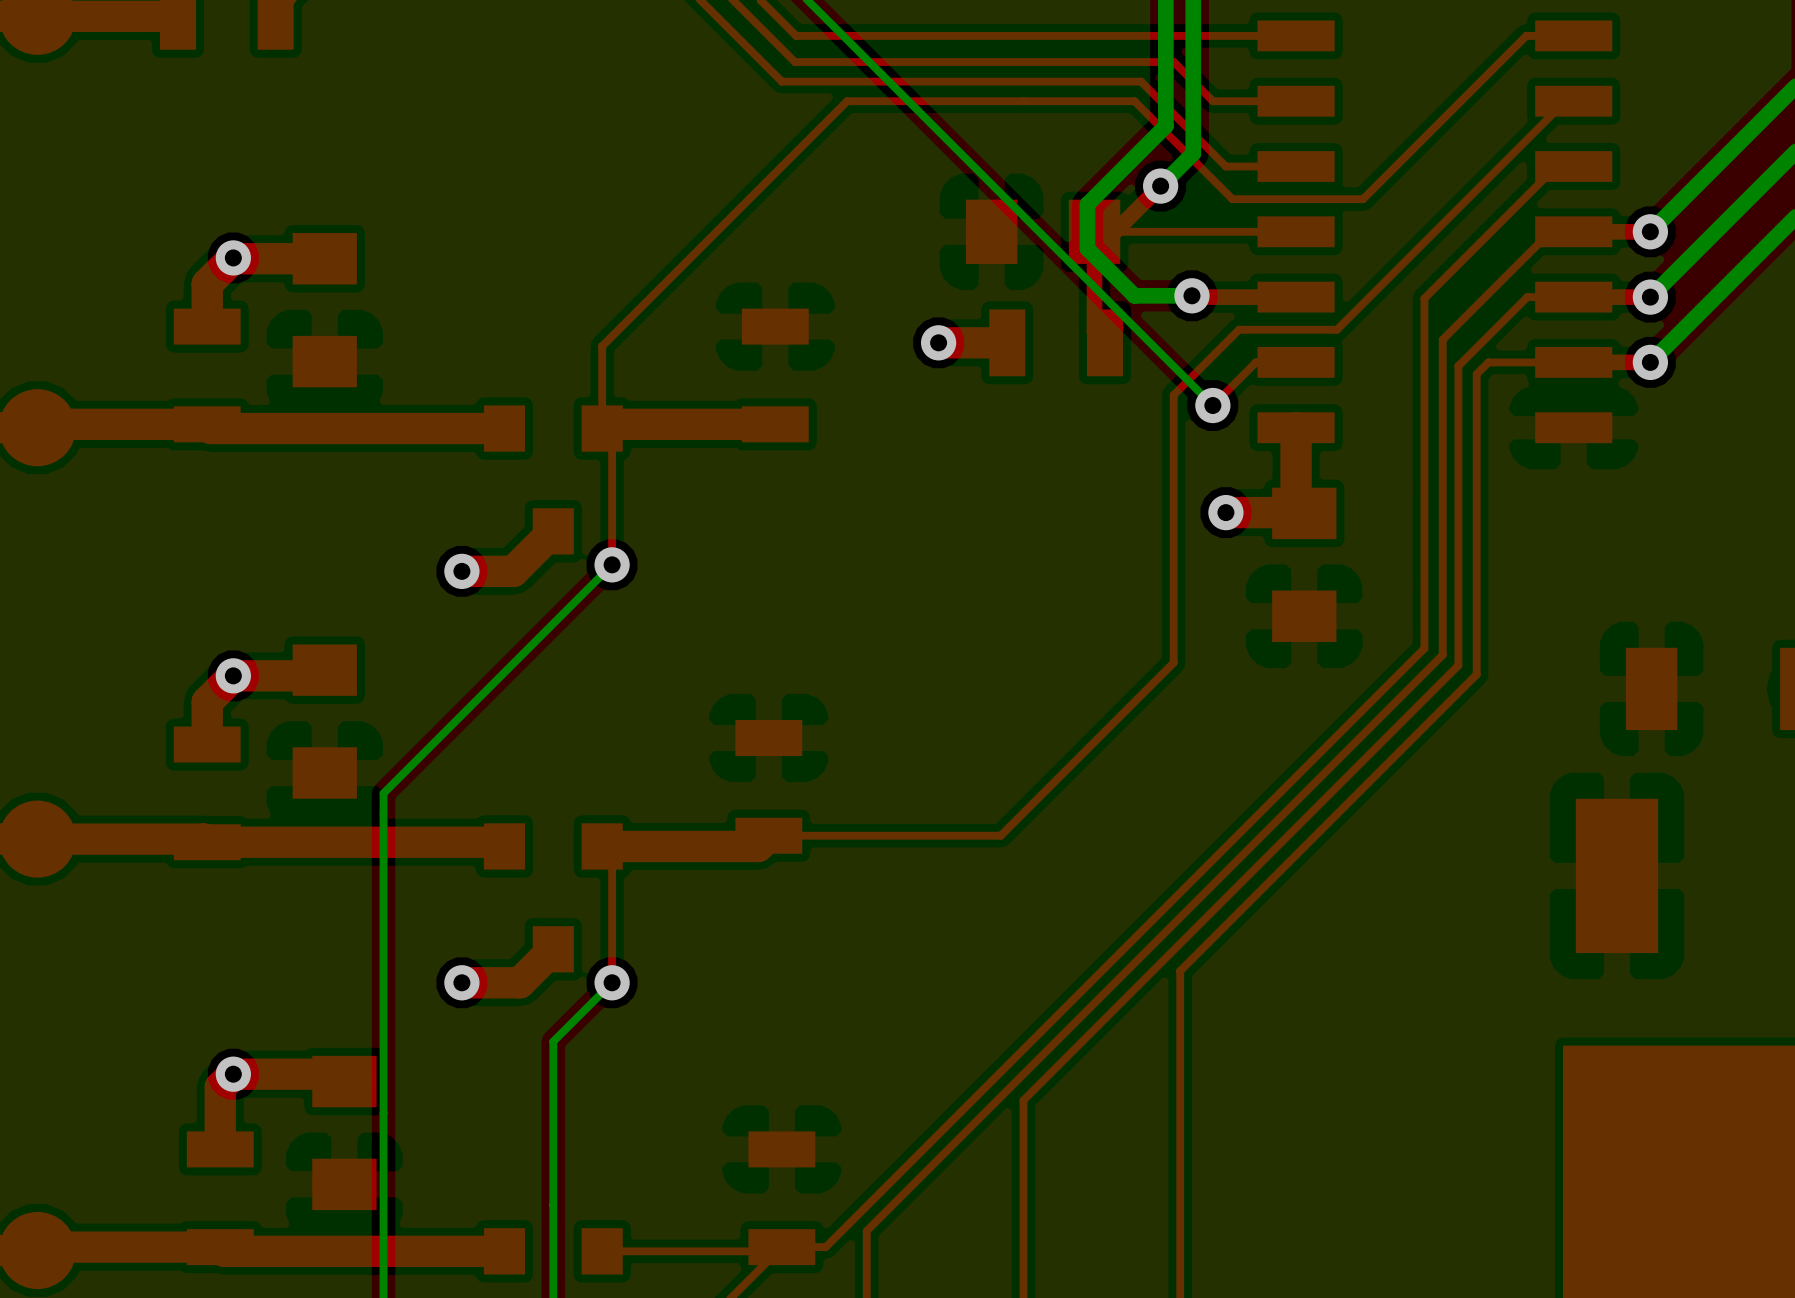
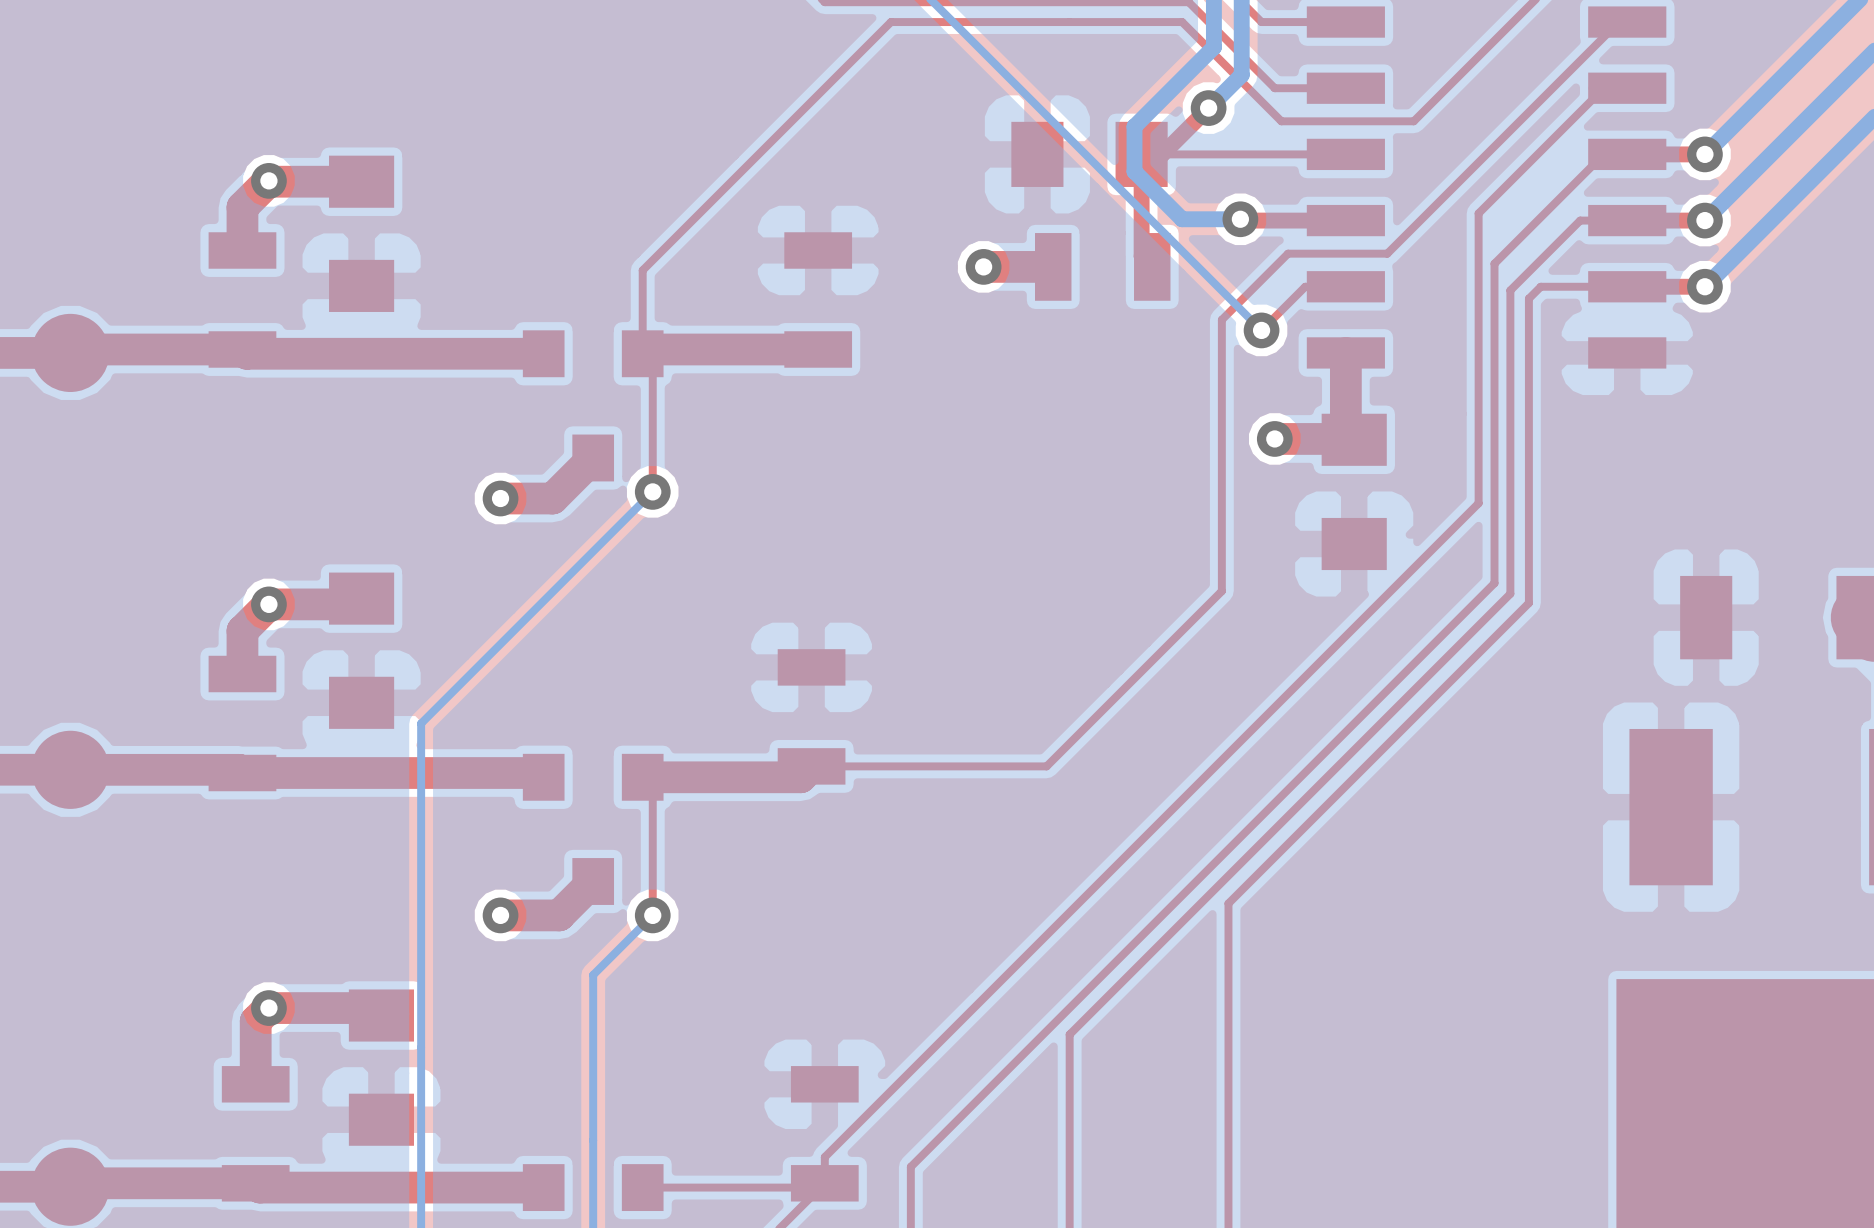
top track: (1556, 166) (1424, 298) (1424, 648) (825, 1247) (781, 1247) -> (1603, 88) (1478, 213) (1478, 503) (824, 1157) (824, 1183)

